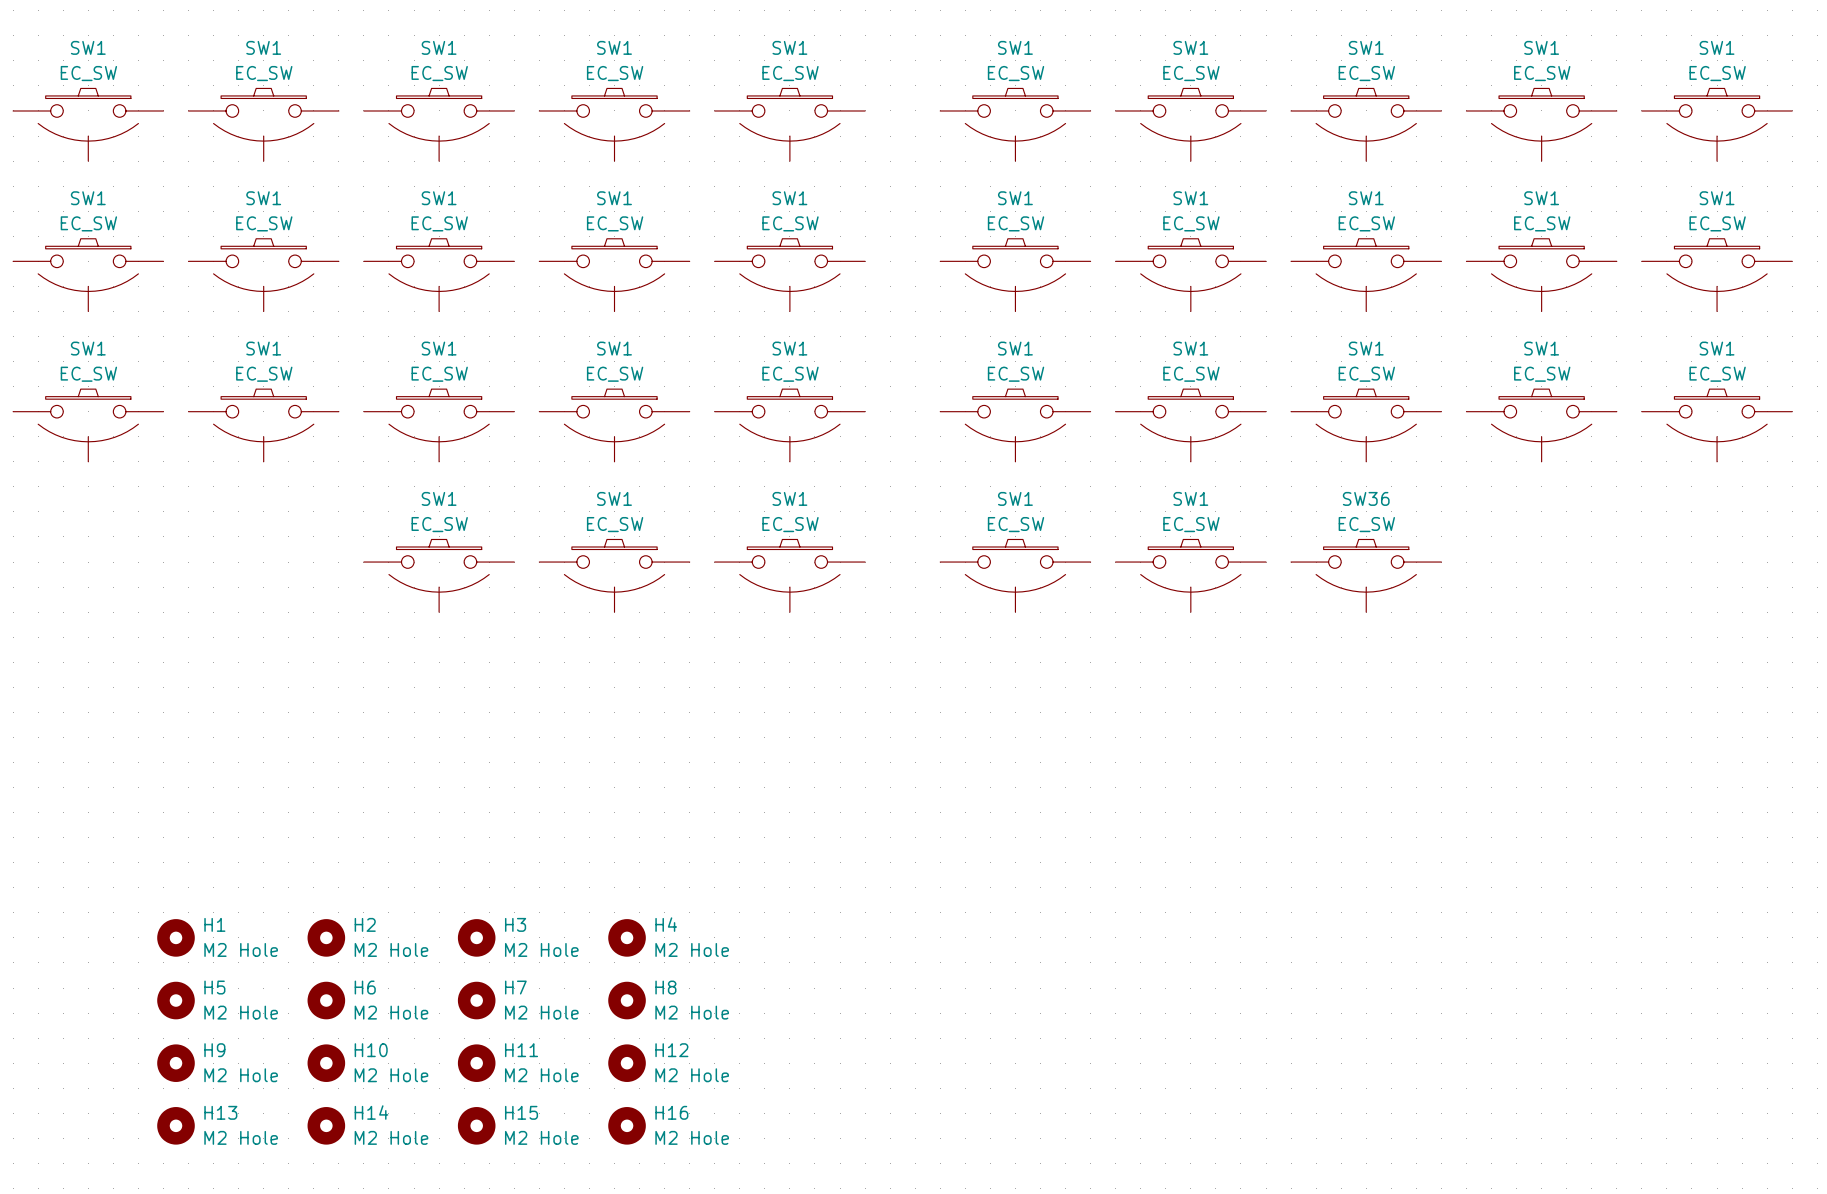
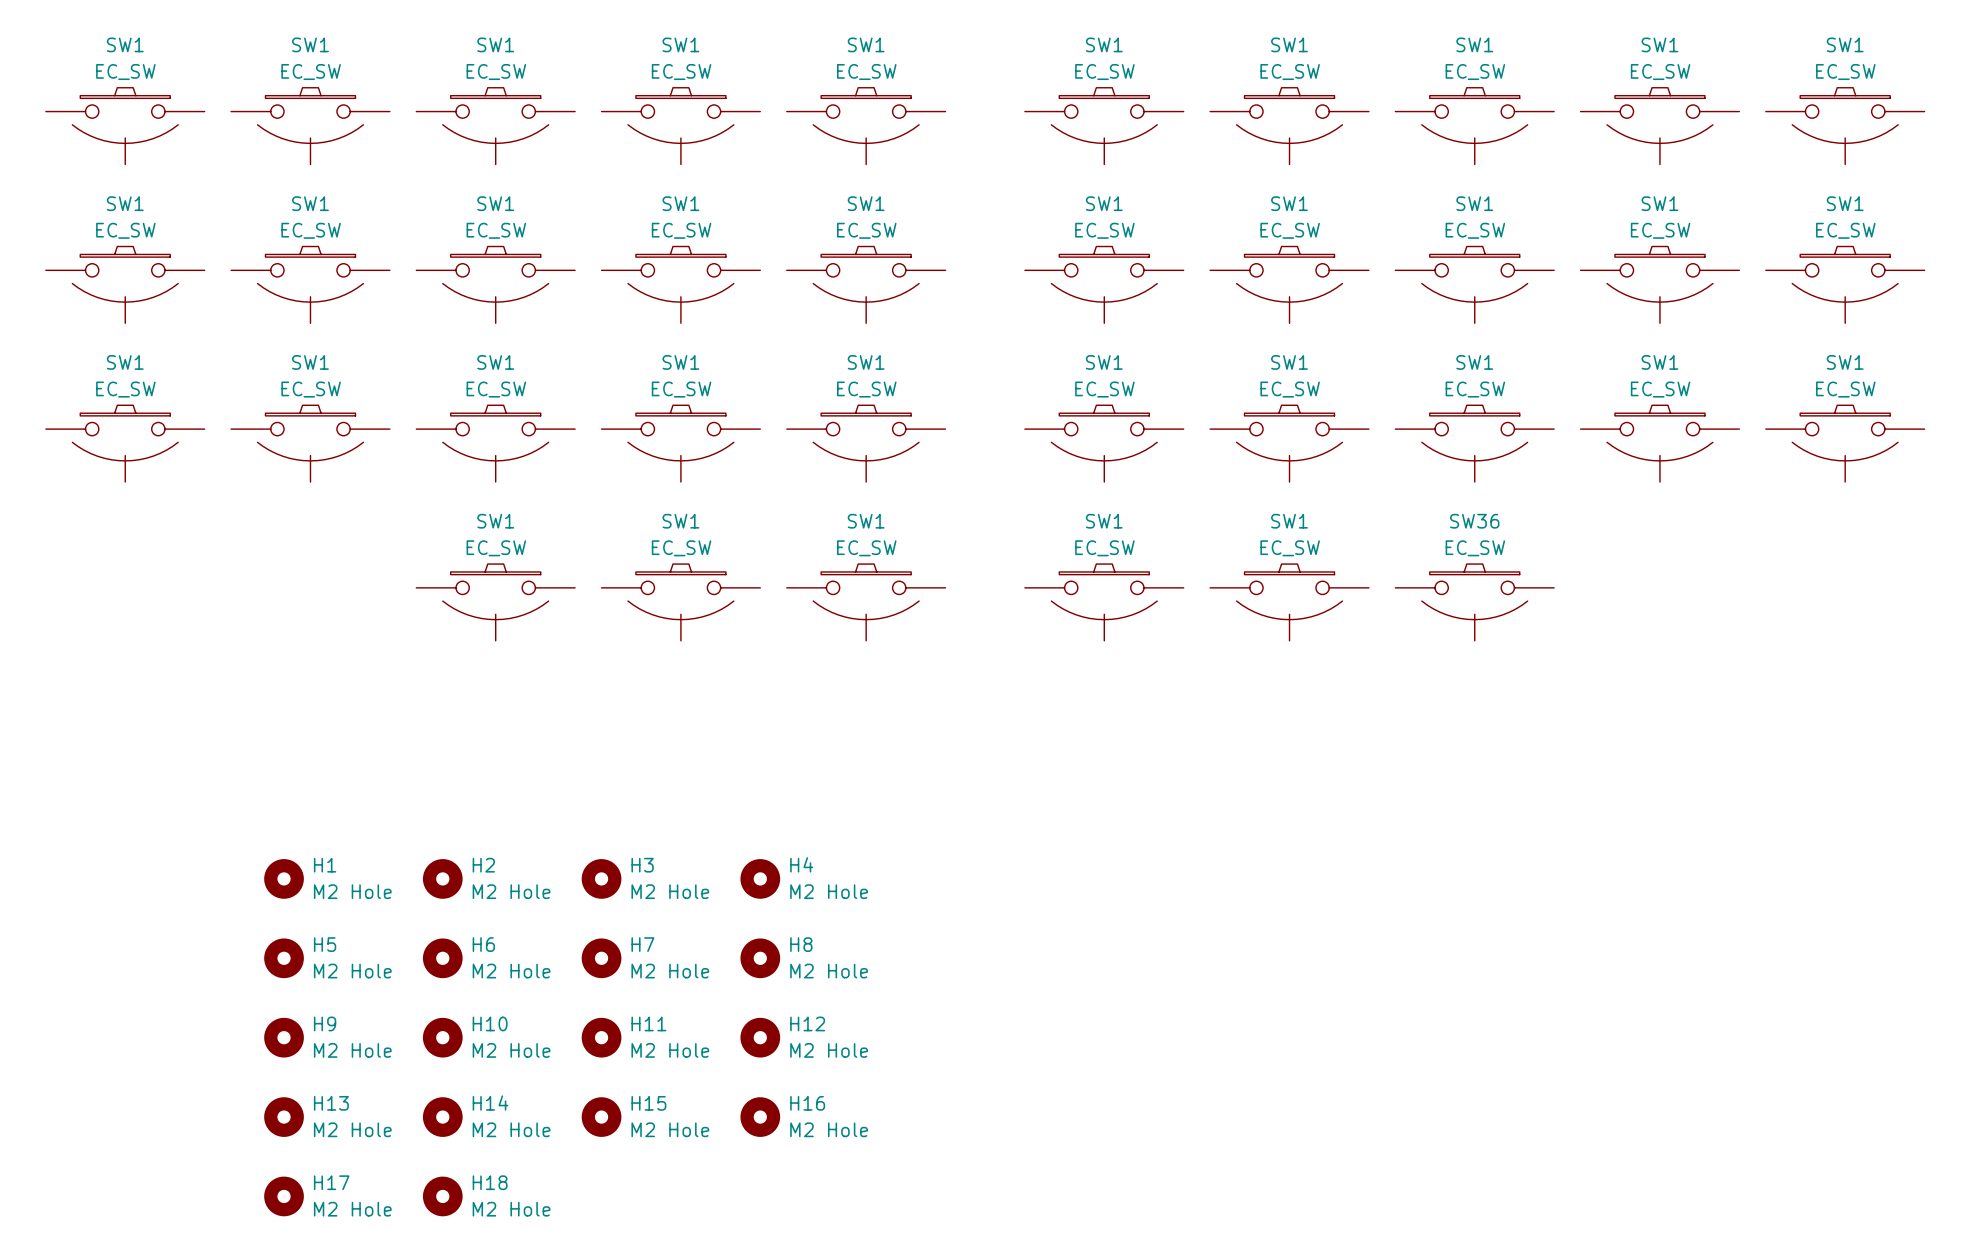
H1 position: (175, 937) -> (284, 878)
H2 position: (326, 937) -> (442, 878)
H3 position: (476, 937) -> (601, 878)
H4 position: (627, 937) -> (760, 878)
H5 position: (175, 1000) -> (284, 958)
H6 position: (326, 1000) -> (442, 958)
H7 position: (476, 1000) -> (601, 958)
H8 position: (627, 1000) -> (760, 958)
H9 position: (175, 1063) -> (284, 1037)
H10 position: (326, 1063) -> (442, 1037)
H11 position: (476, 1063) -> (601, 1037)
H12 position: (627, 1063) -> (760, 1037)
H13 position: (175, 1125) -> (284, 1117)
H14 position: (326, 1125) -> (442, 1117)
H15 position: (476, 1125) -> (601, 1117)
H16 position: (627, 1125) -> (760, 1117)
H17: none -> M2 Hole (284, 1196)
H18: none -> M2 Hole (442, 1196)

